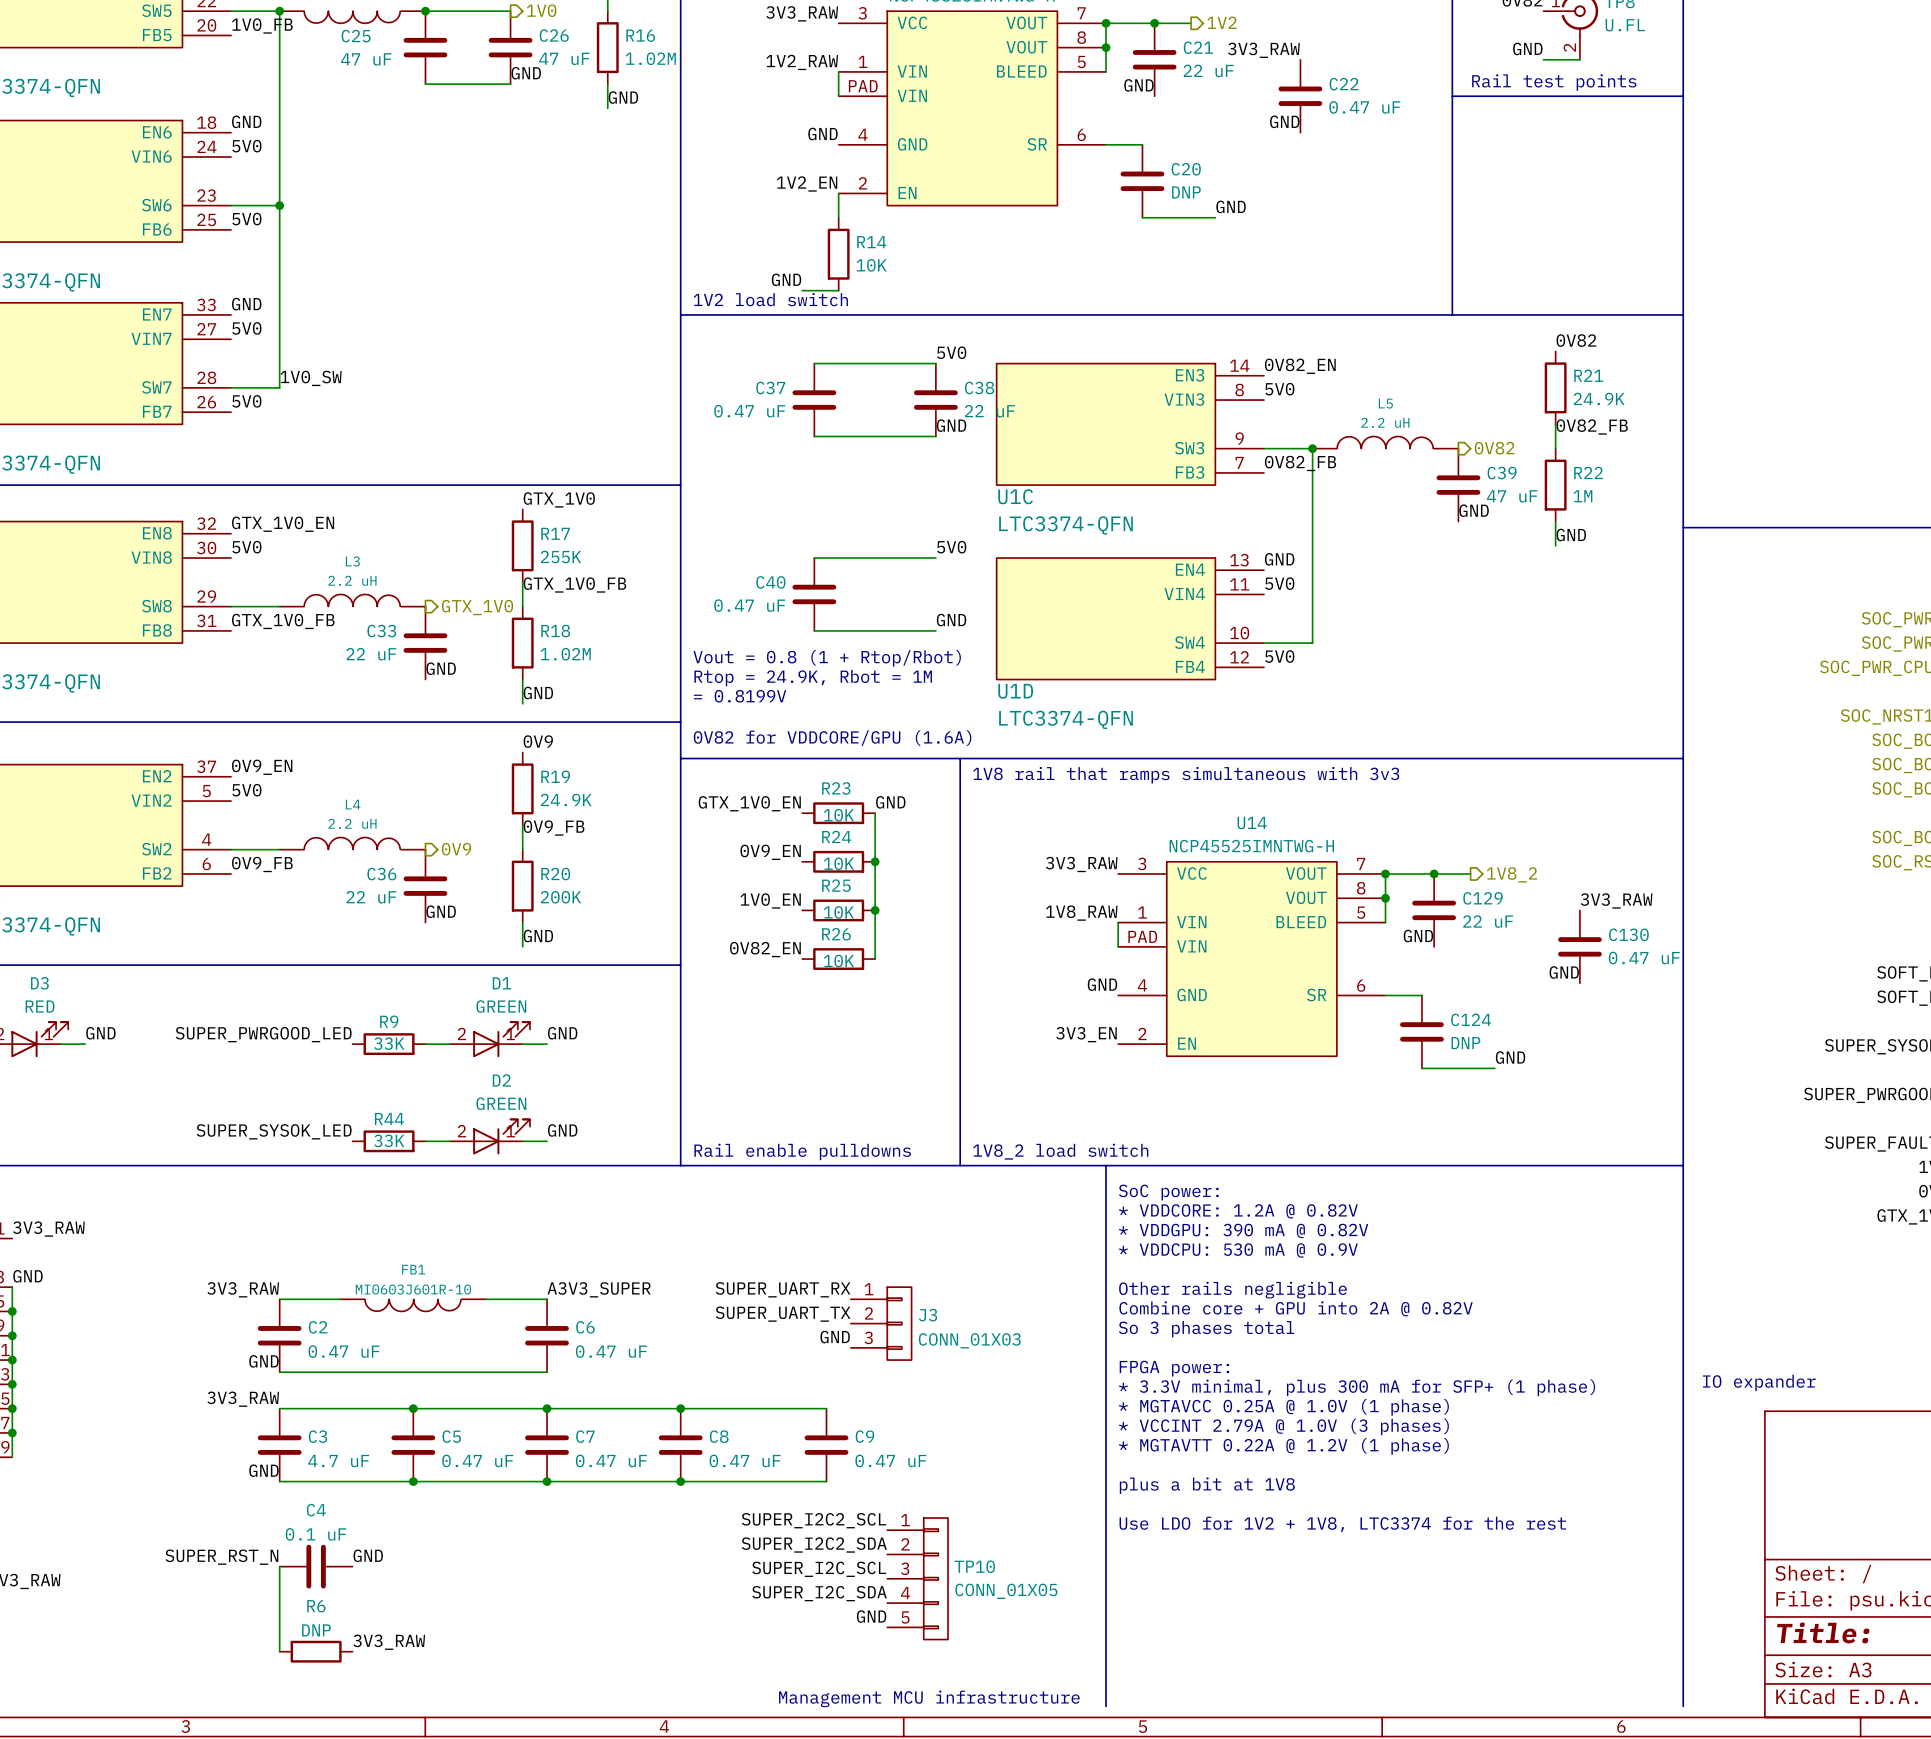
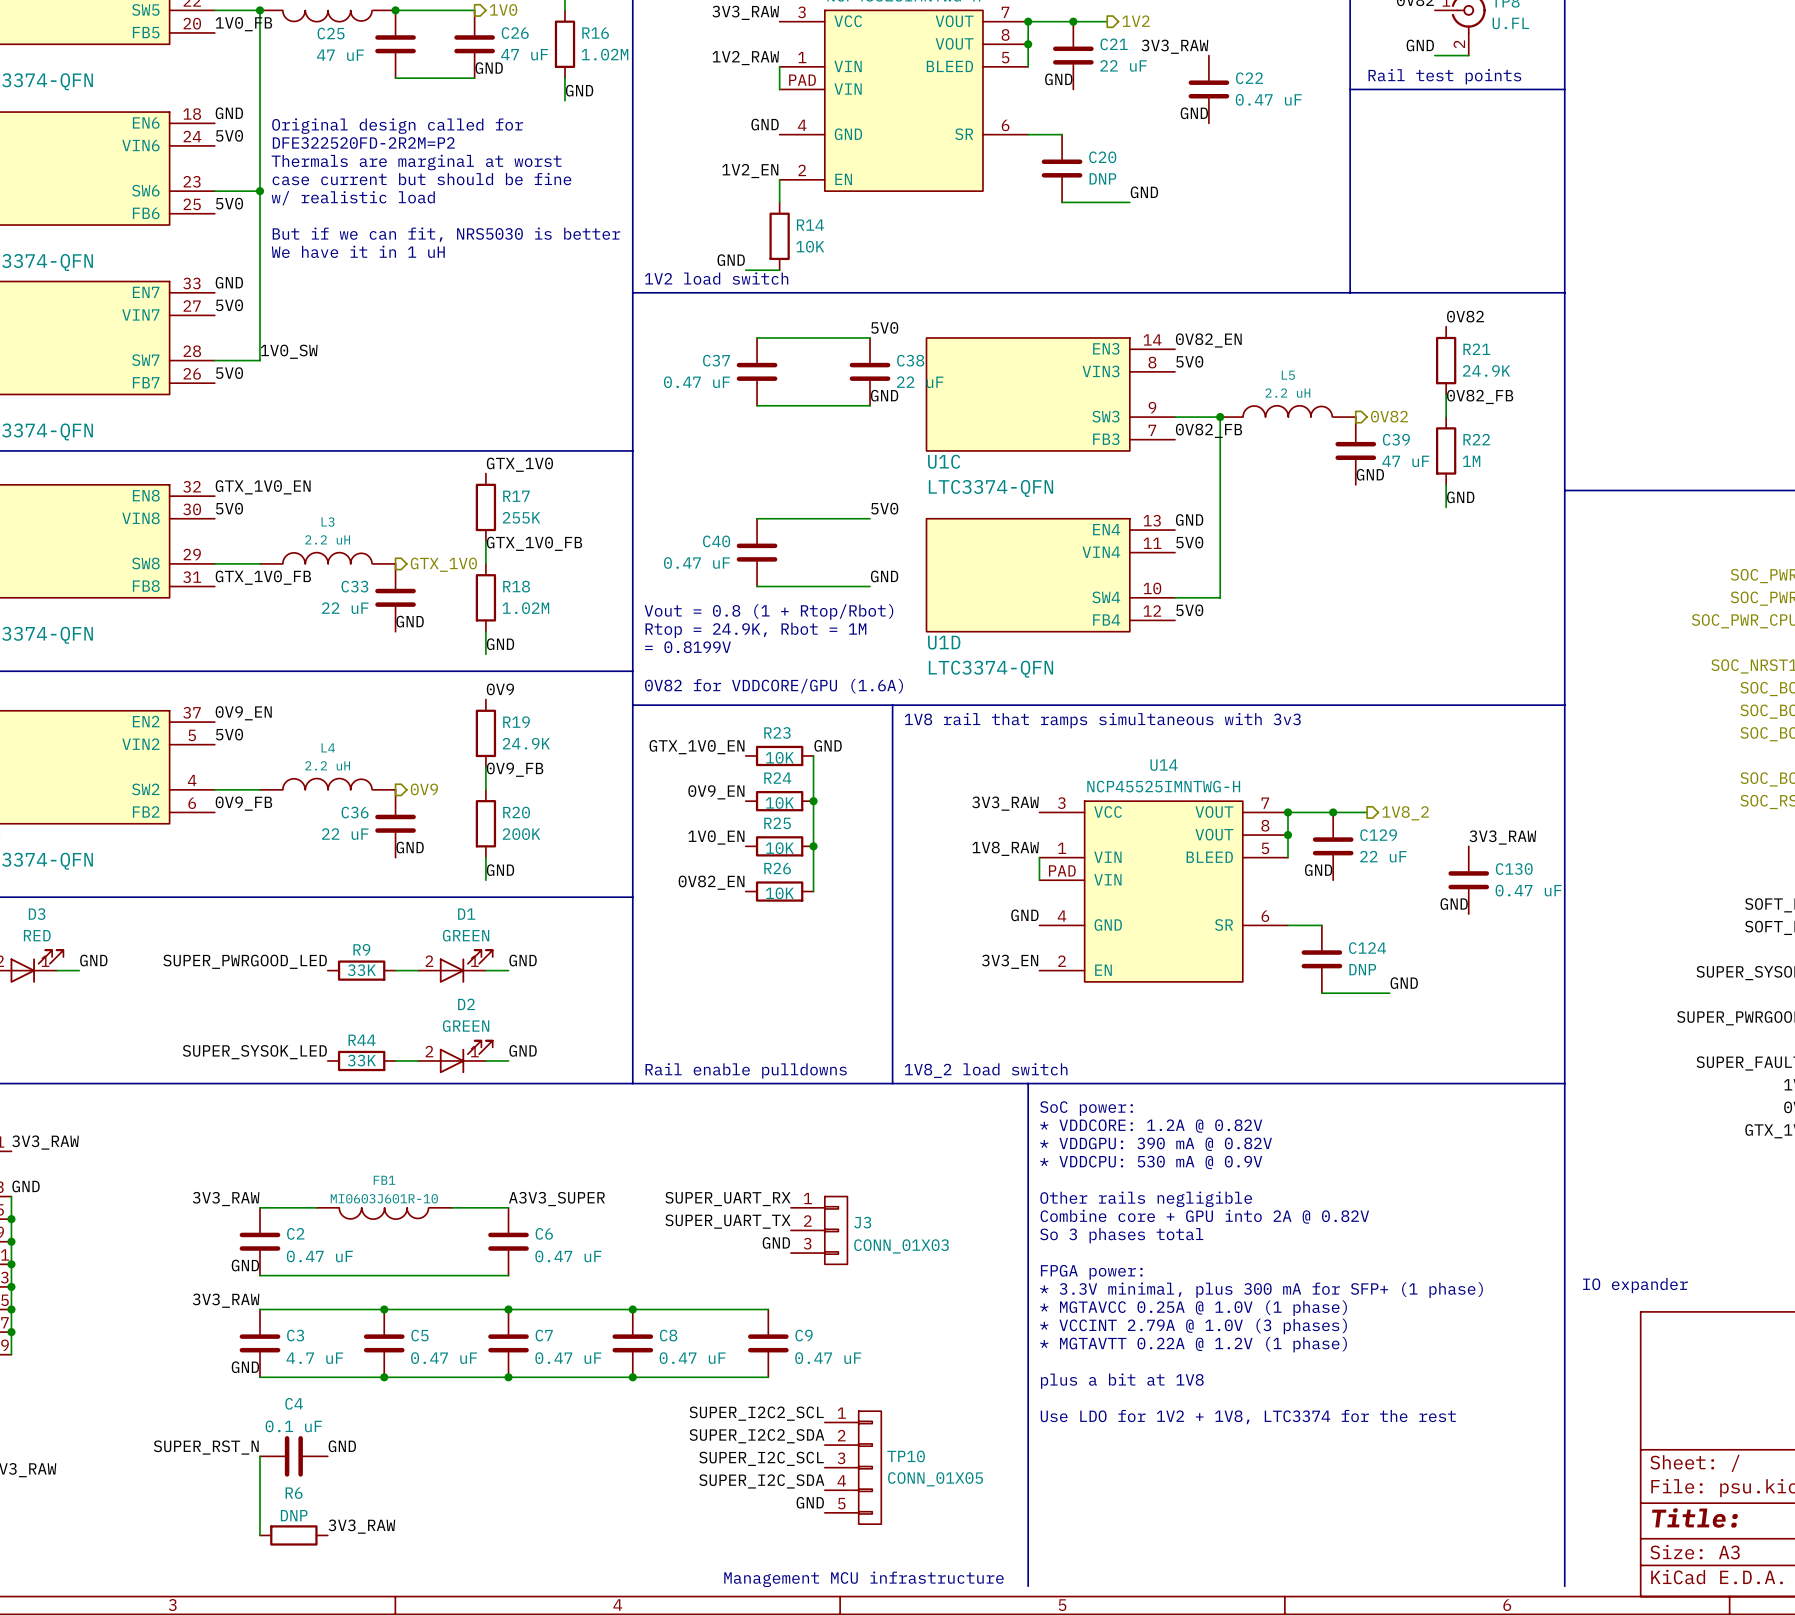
text: none -> Original design called for (397, 126)
text: none -> DFE322520FD-2R2M=P2 (363, 143)
text: none -> Thermals are marginal at worst (416, 162)
text: none -> case current but should be fine (421, 179)
text: none -> w/ realistic load (353, 198)
text: none -> But if we can fit, NRS5030 is better (446, 234)
text: none -> We have it in 1 uH (358, 251)

